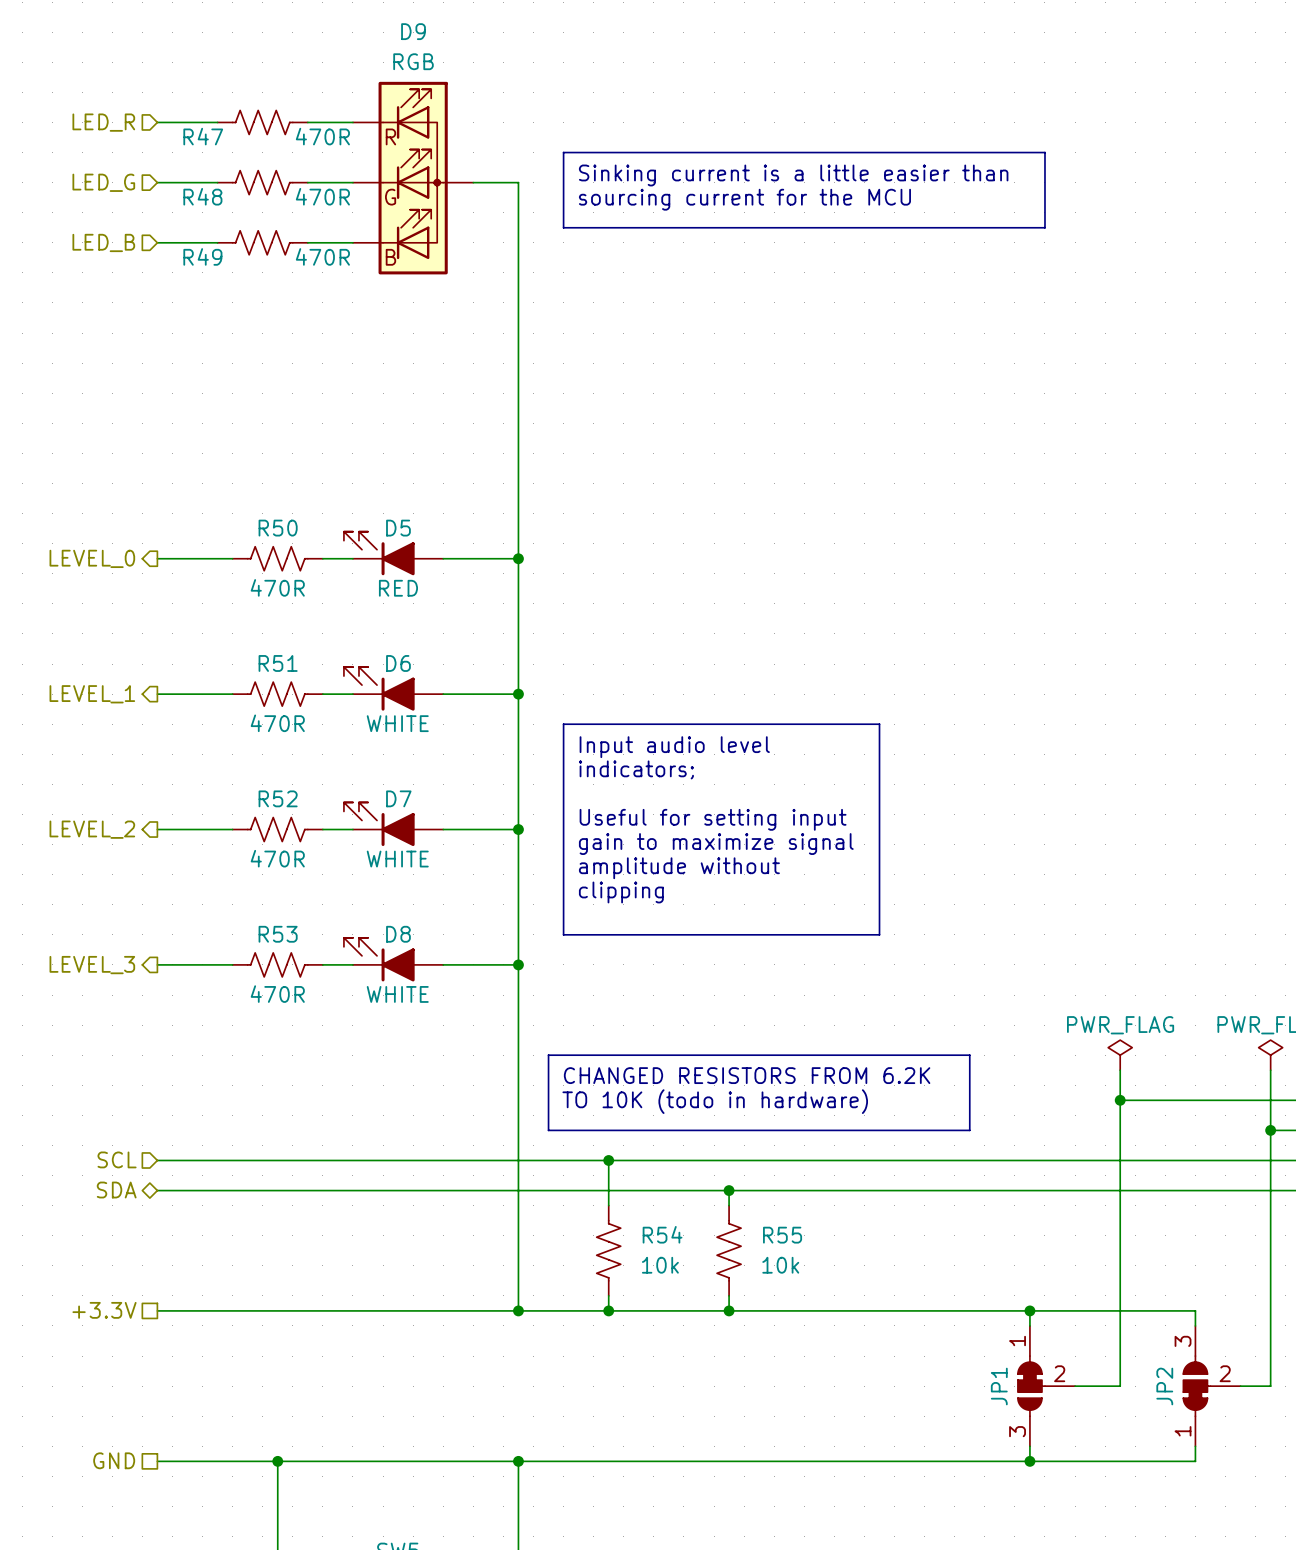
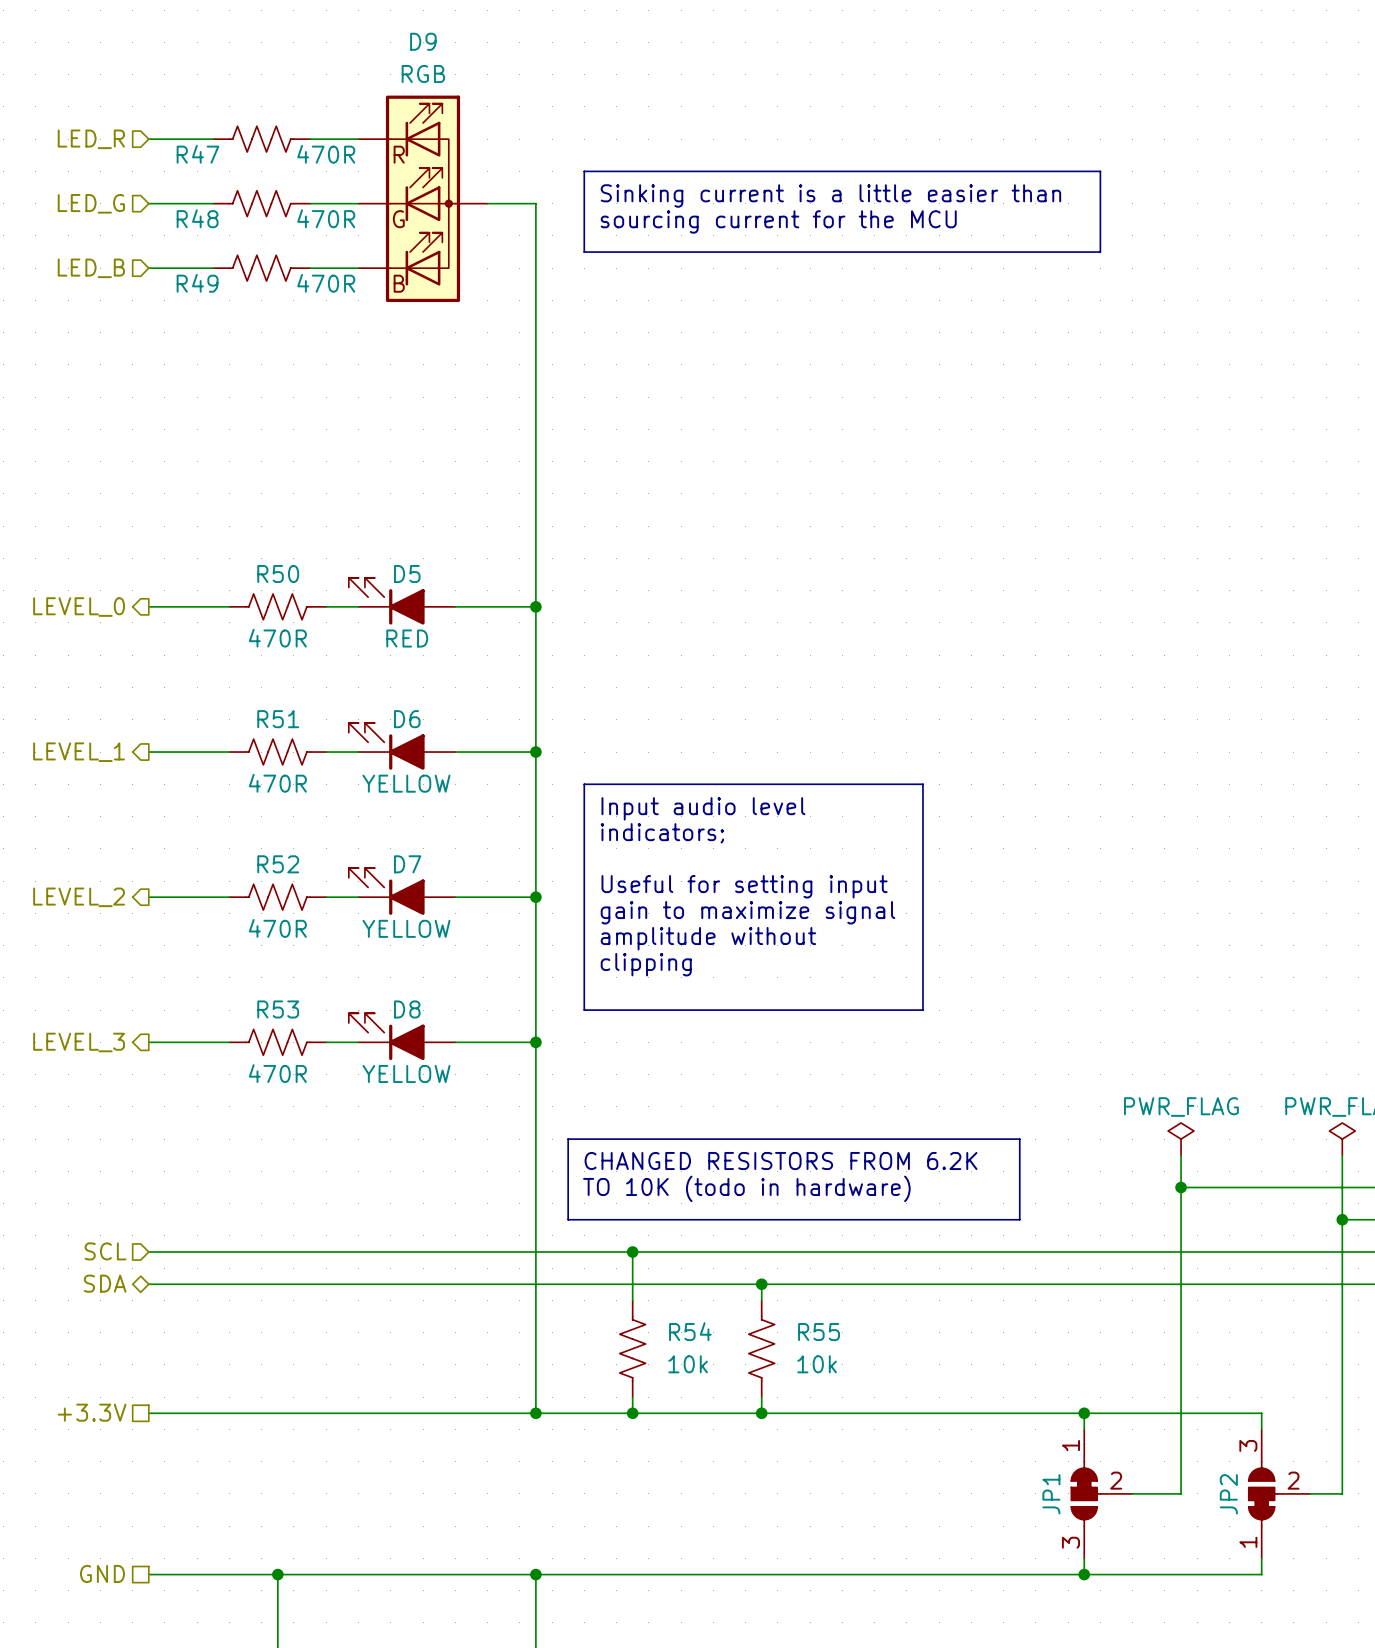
D6 value: WHITE (397, 723) -> YELLOW (406, 783)
D7 value: WHITE (397, 859) -> YELLOW (406, 928)
D8 value: WHITE (397, 994) -> YELLOW (406, 1073)

